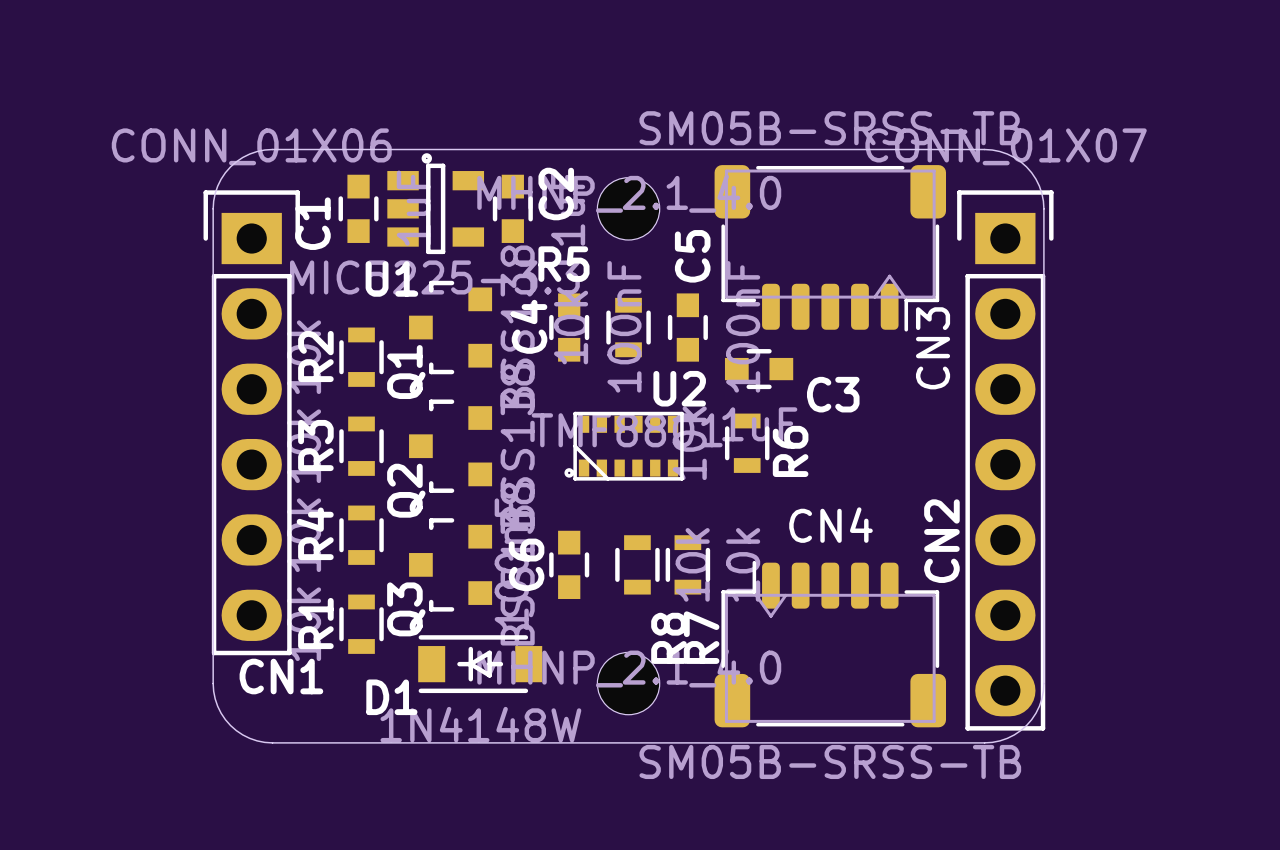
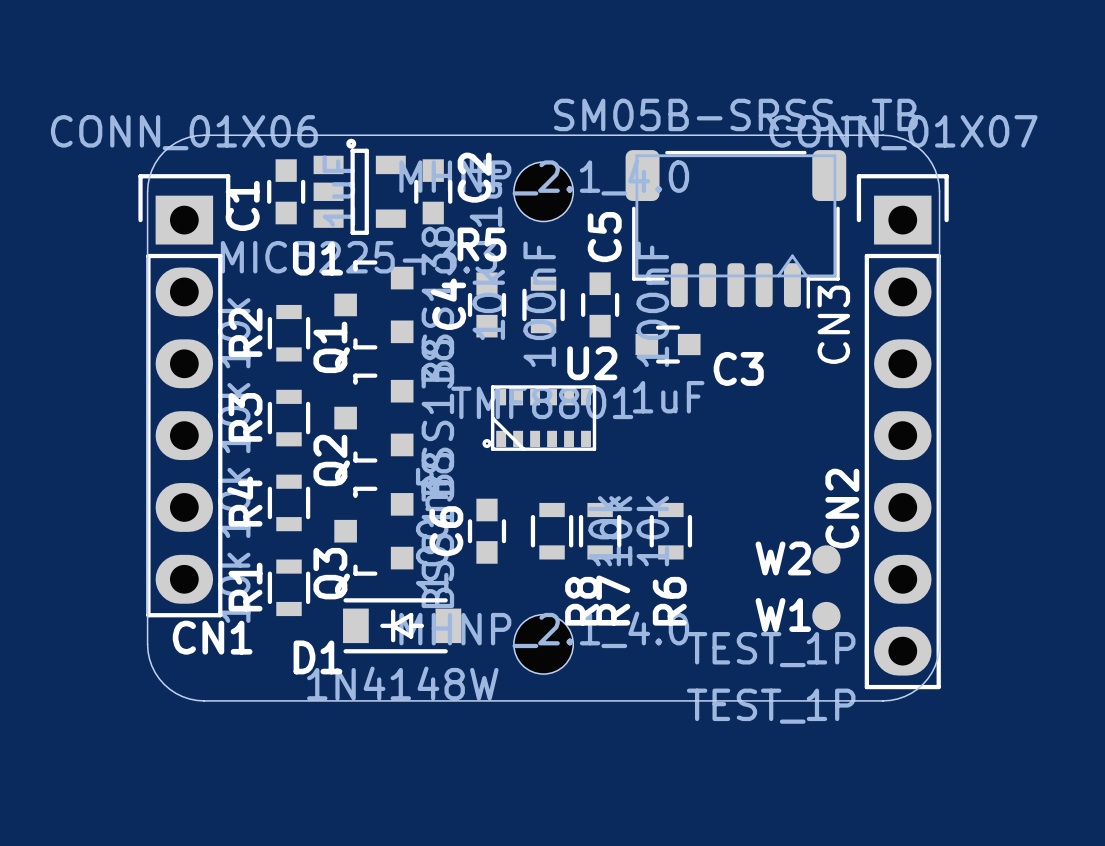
R6 position: (747, 443) -> (670, 531)
R6 name position: R6 (790, 451) -> R6 (669, 601)
W2: none -> TEST_1P (826, 559)
CN4: SM05B-SRSS-TB (830, 644) -> none
W1: none -> TEST_1P (826, 616)

